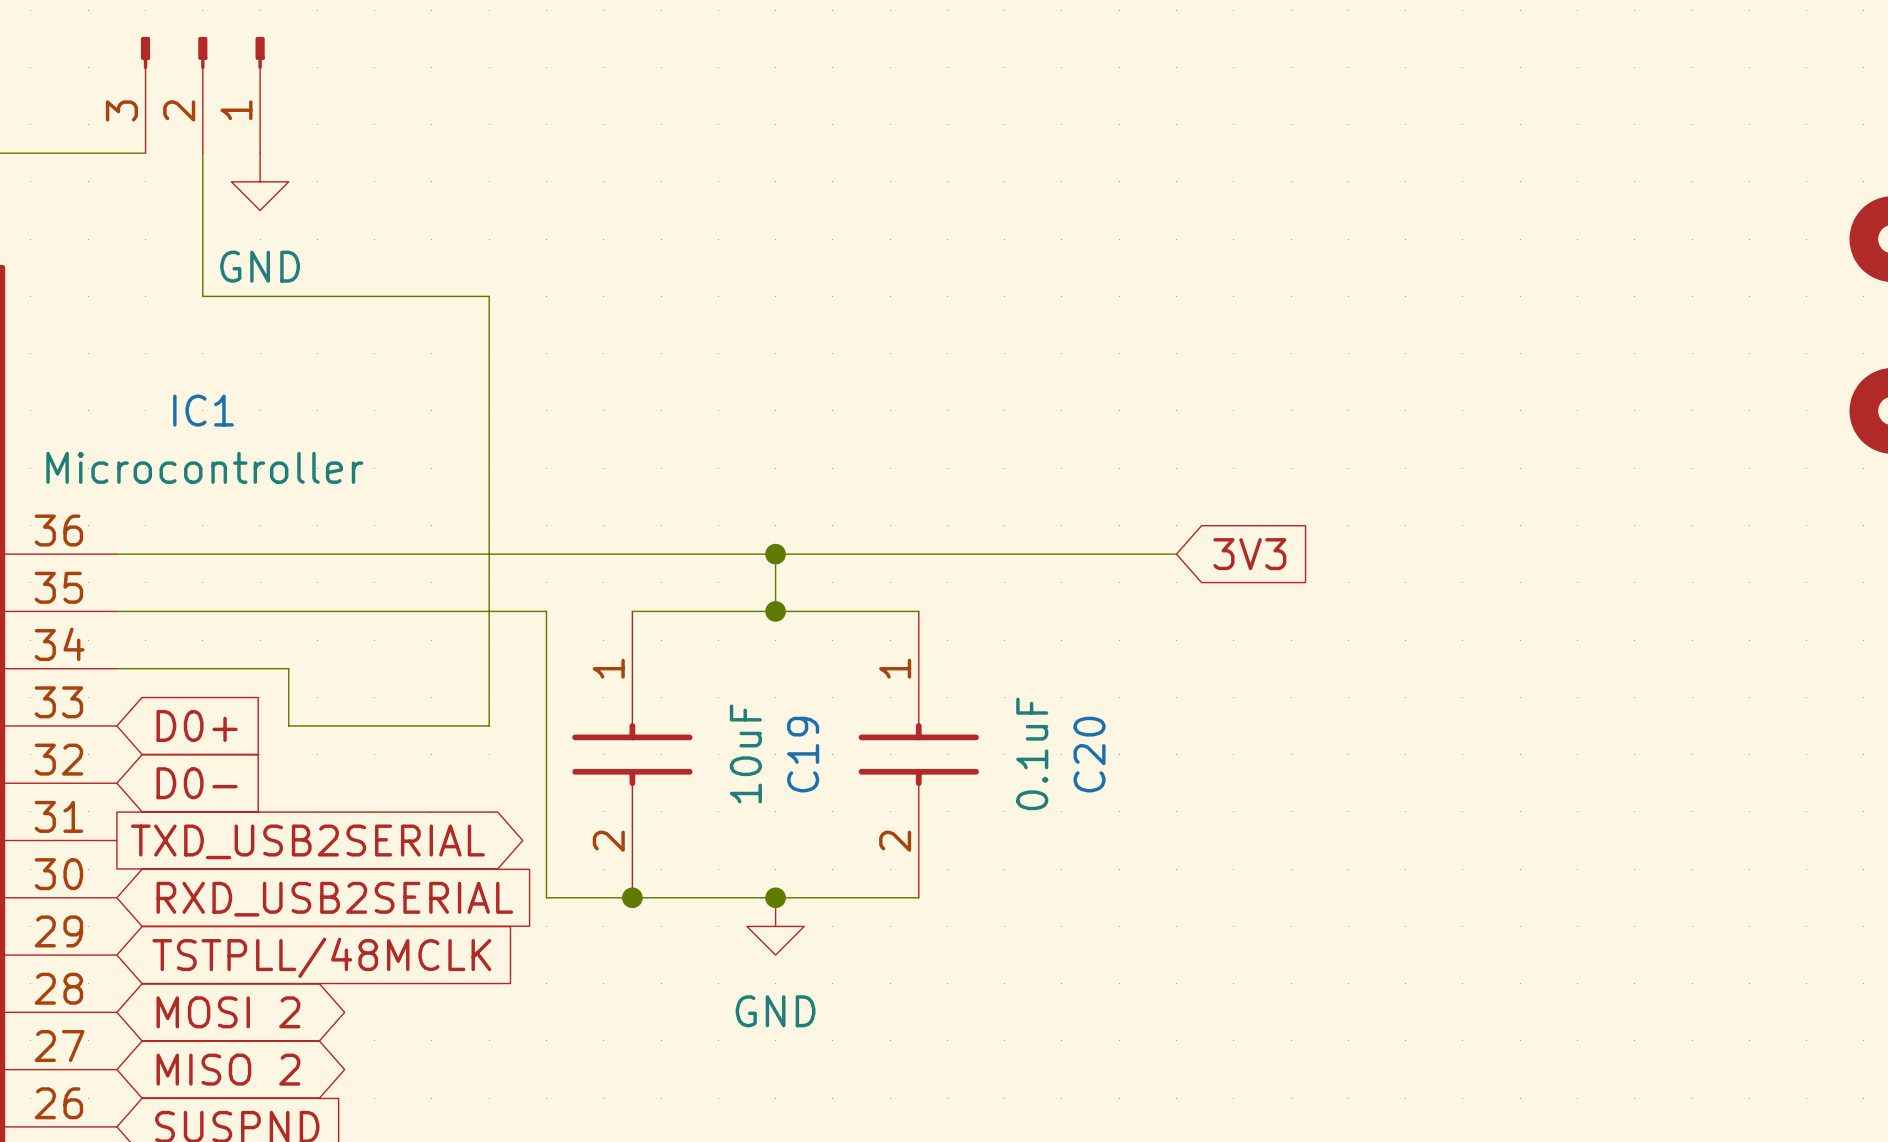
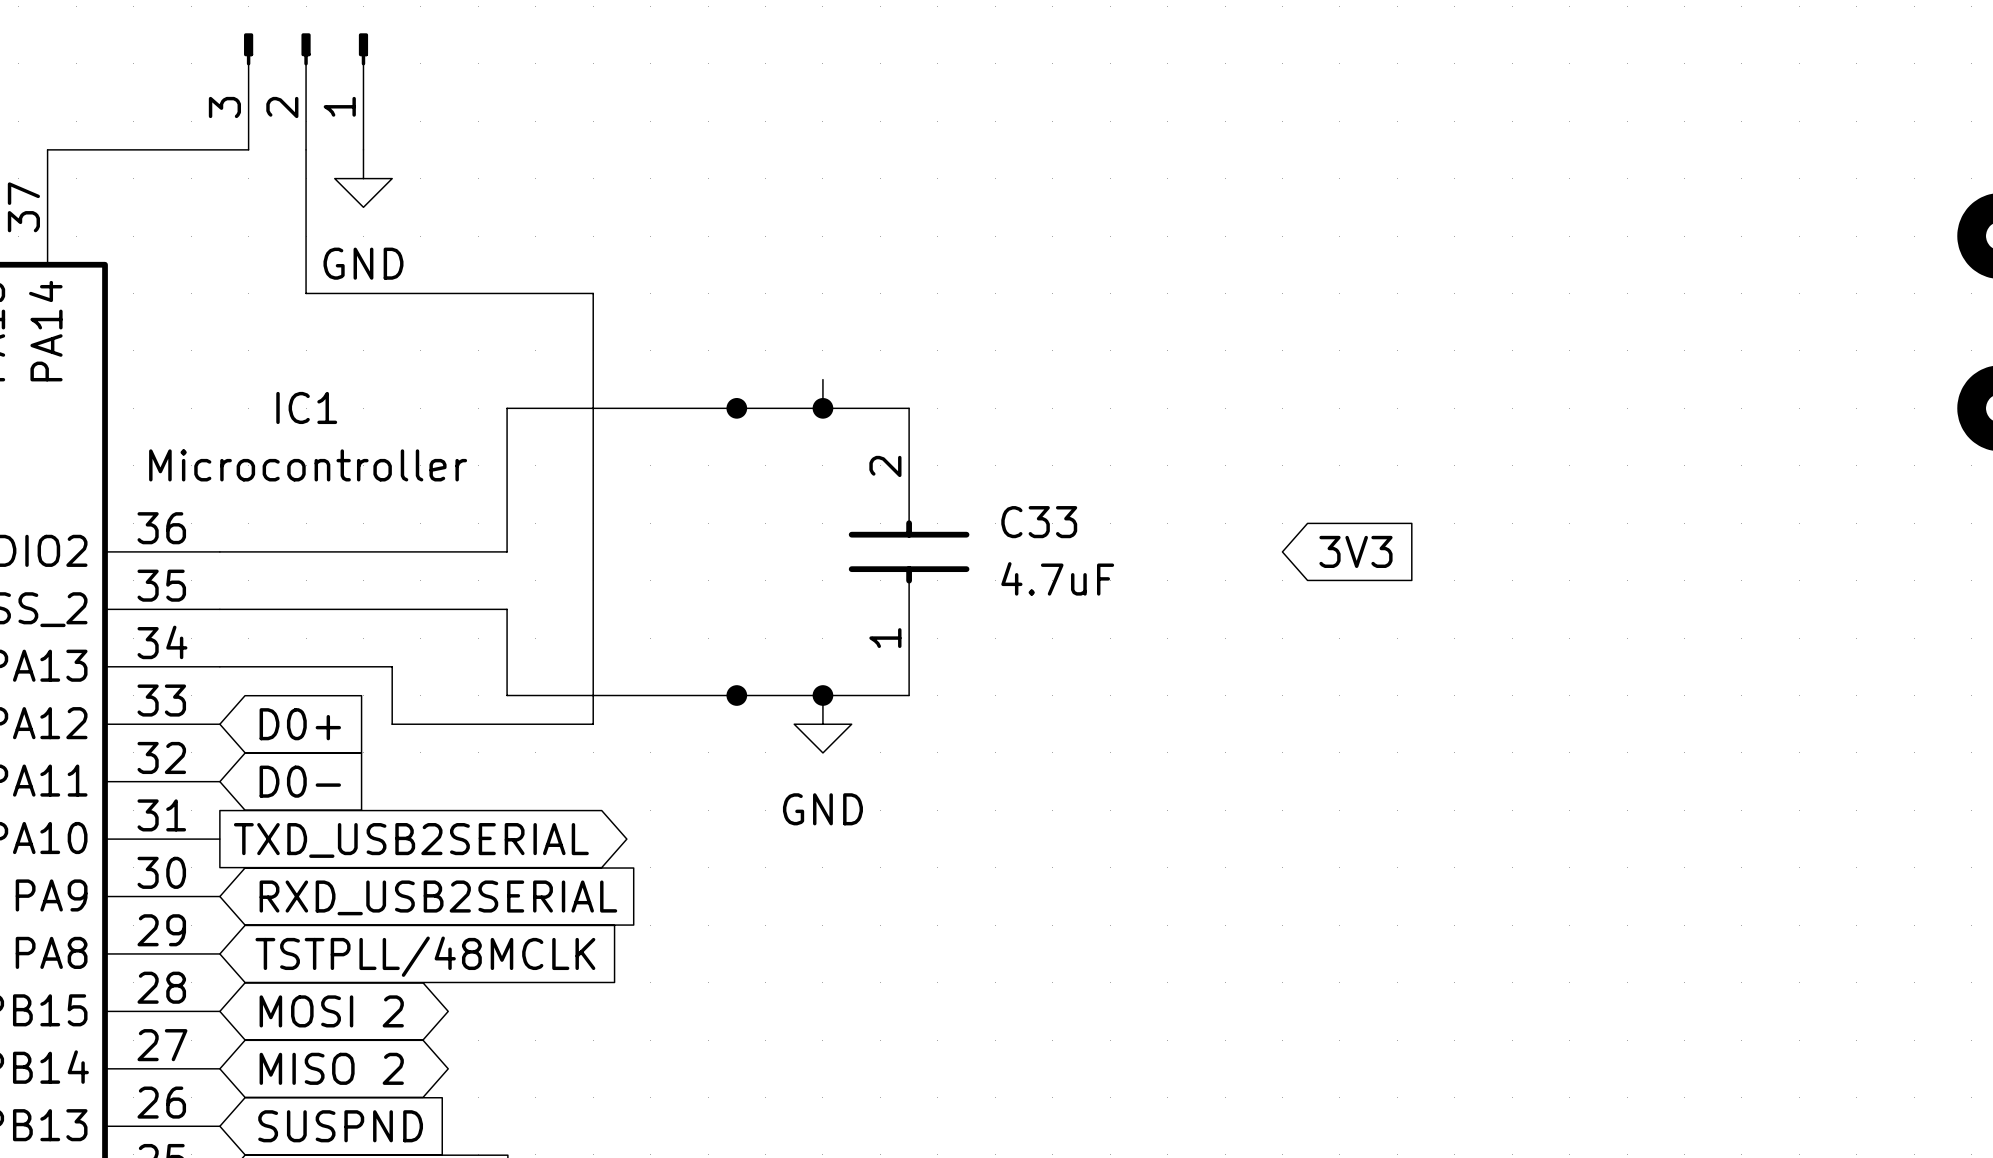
wire: none -> (822, 379) (822, 408)
junction: none -> (736, 408)
junction: none -> (822, 408)
wire: (403, 554) (1176, 554) -> (507, 551) (507, 408) (909, 408)
wire: (775, 554) (775, 611) -> none
junction: (775, 554) -> none
C33: none -> 4.7uF (909, 551)
wire: (403, 611) (546, 611) (546, 897) (918, 897) -> (507, 609) (507, 695) (909, 695)
wire: (632, 611) (918, 611) -> none
junction: (775, 611) -> none
junction: none -> (736, 695)
junction: none -> (822, 695)
C19: 10uF (632, 754) -> none
C20: 0.1uF (918, 754) -> none
junction: (632, 897) -> none
junction: (775, 897) -> none
power symbol position: GND (775, 926) -> GND (822, 724)

